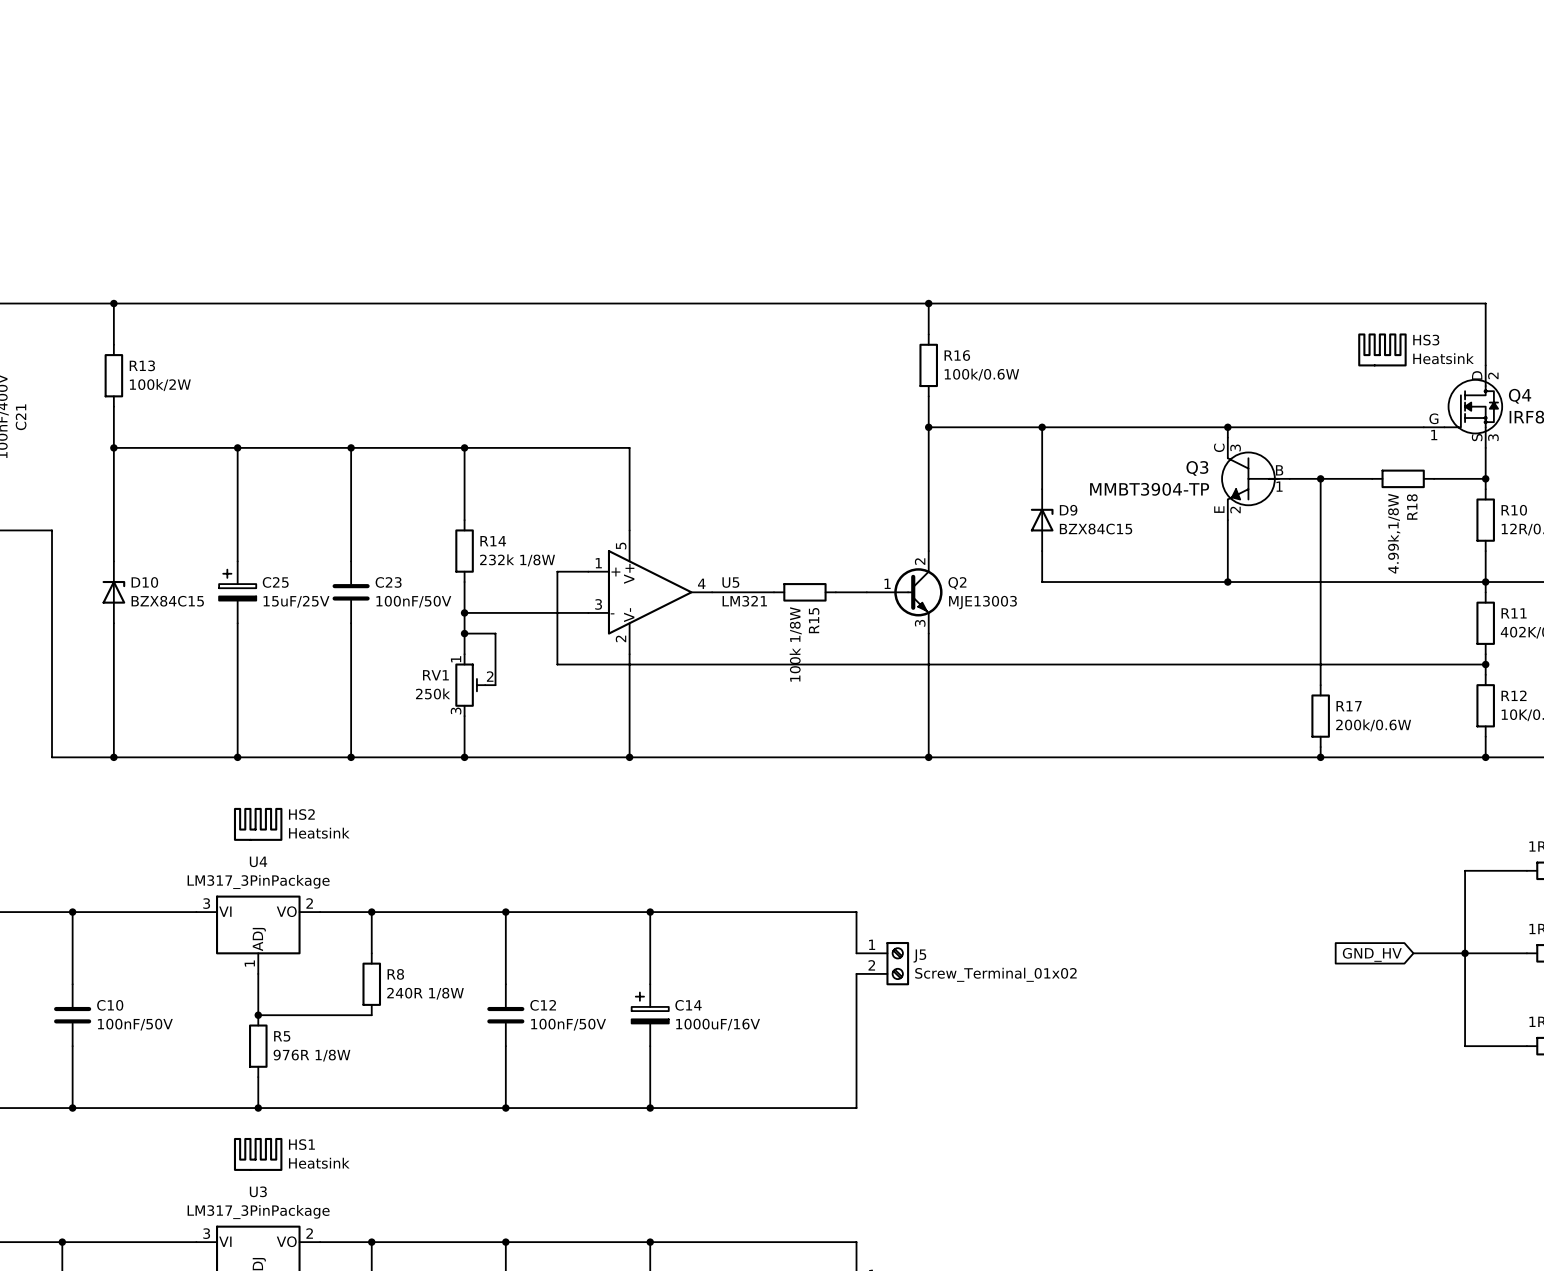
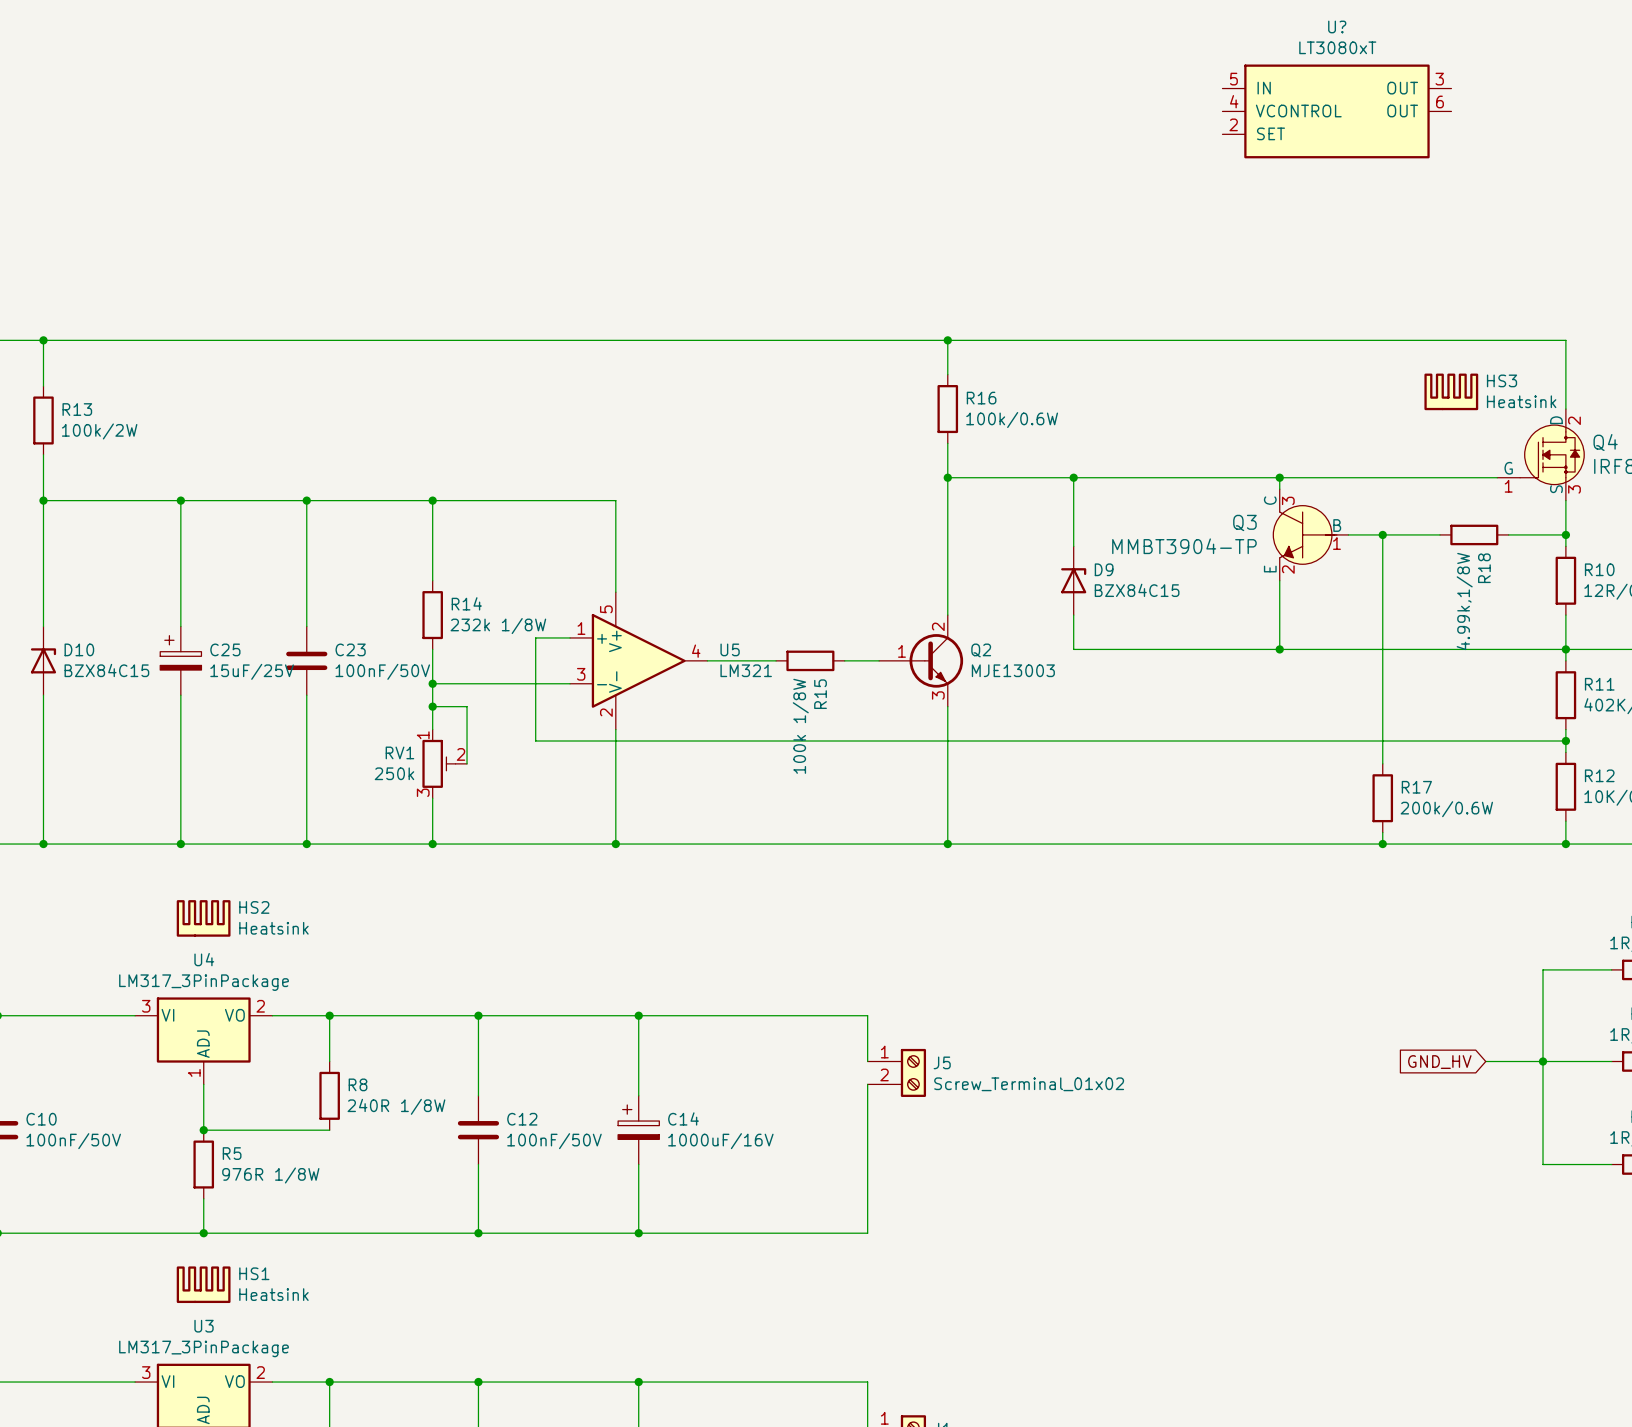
U?: none -> LT3080xT (1336, 111)

